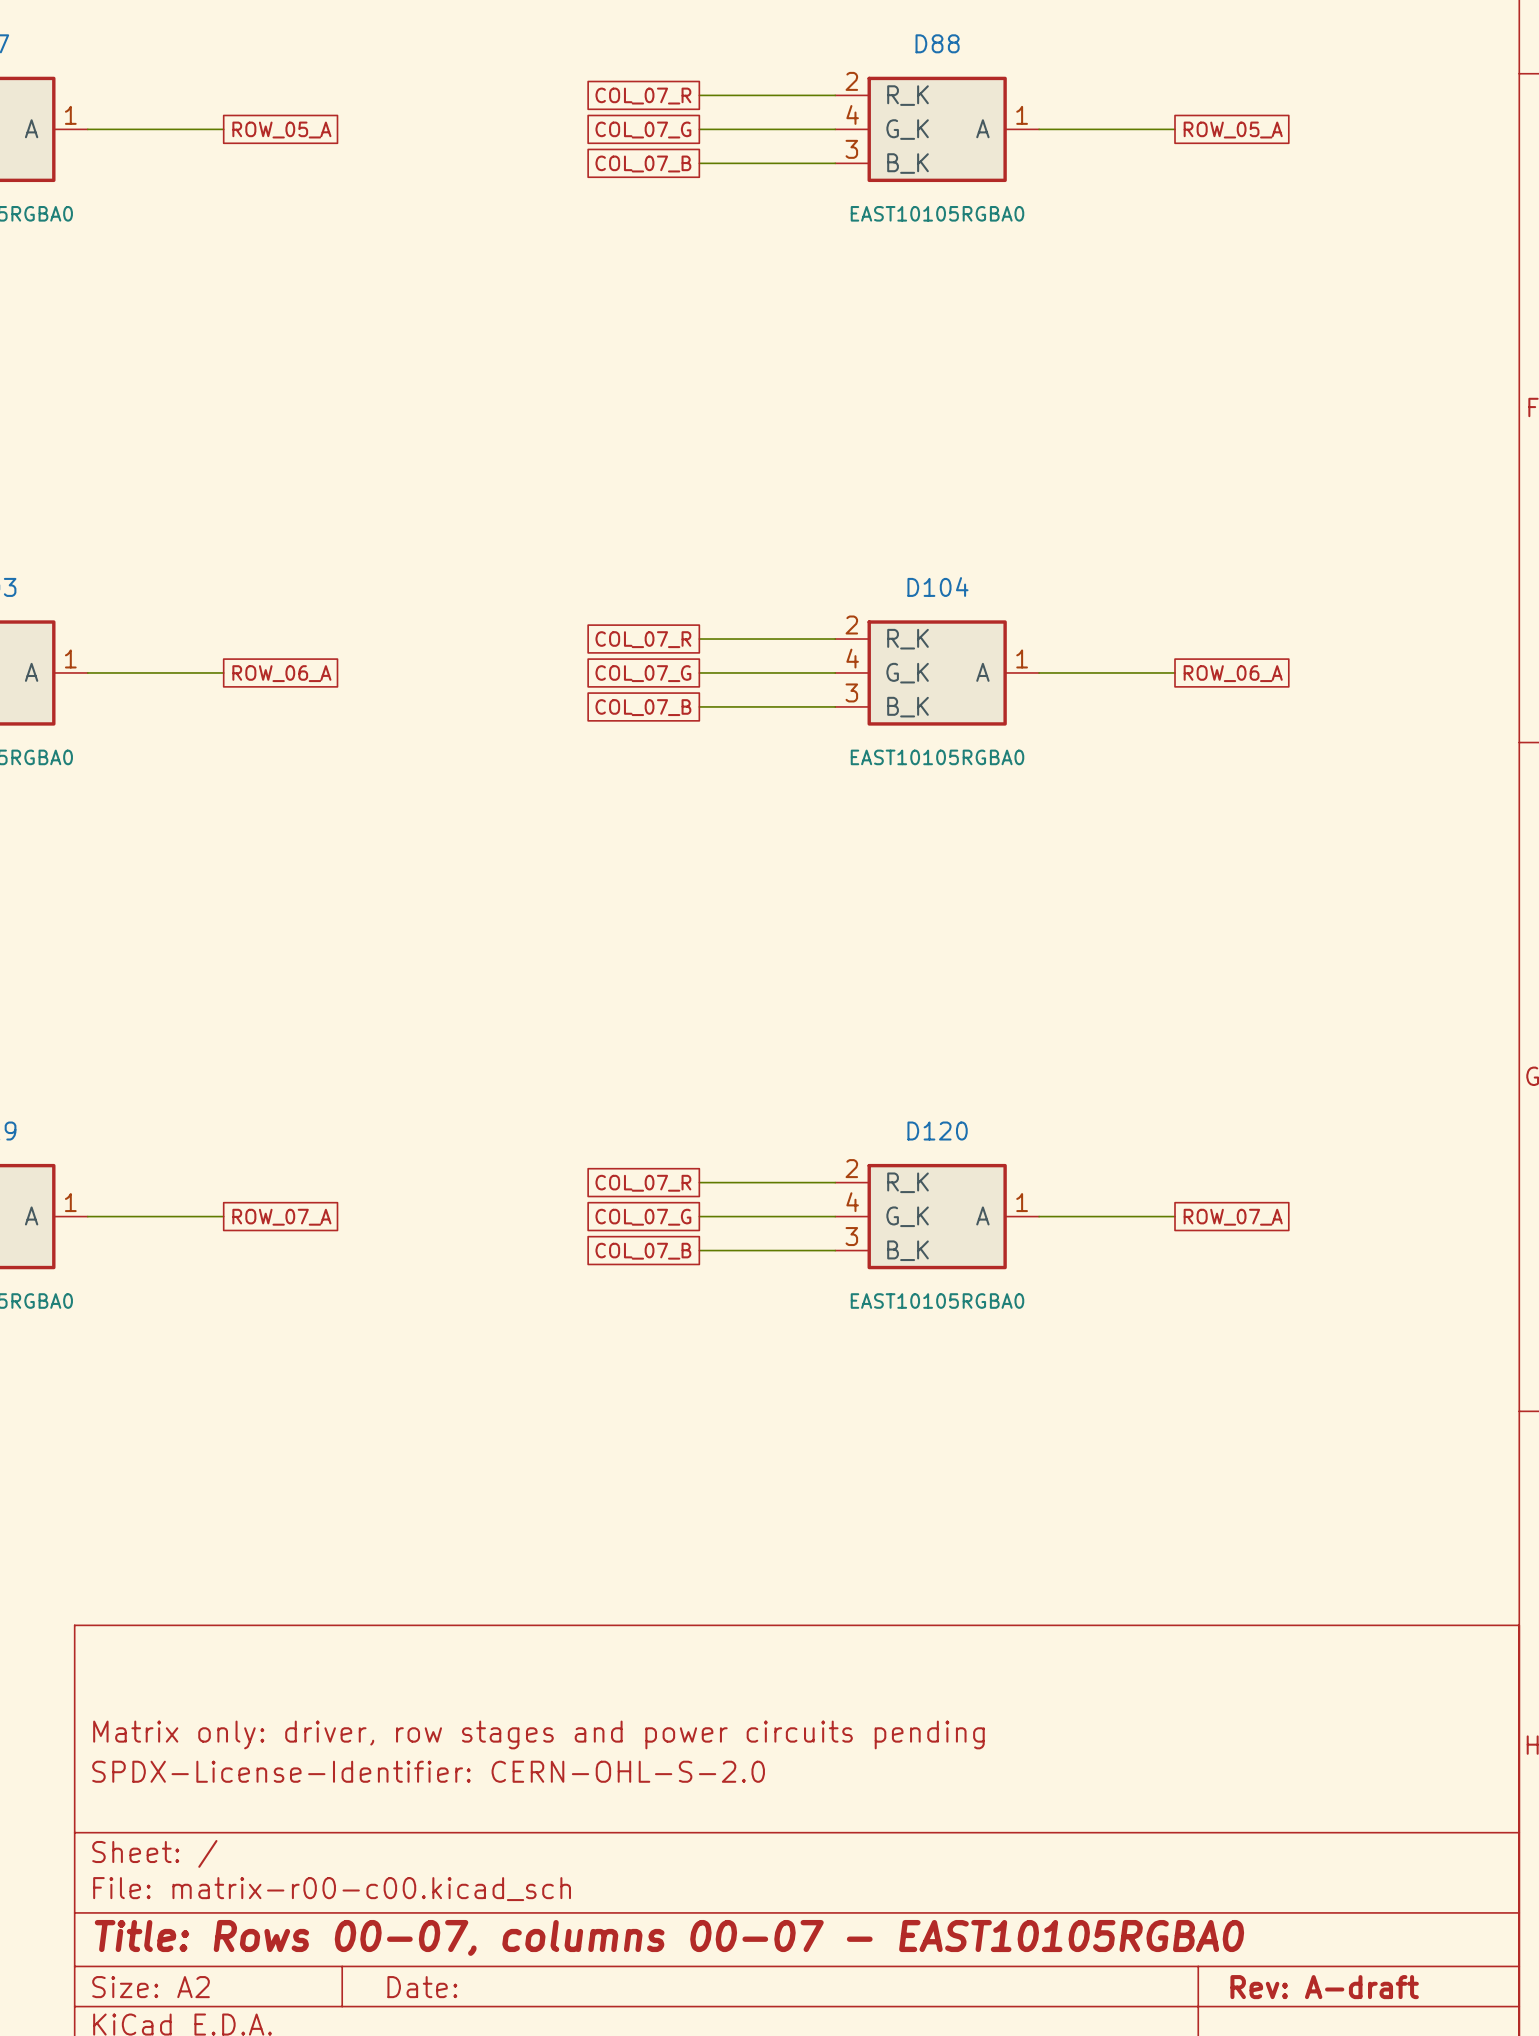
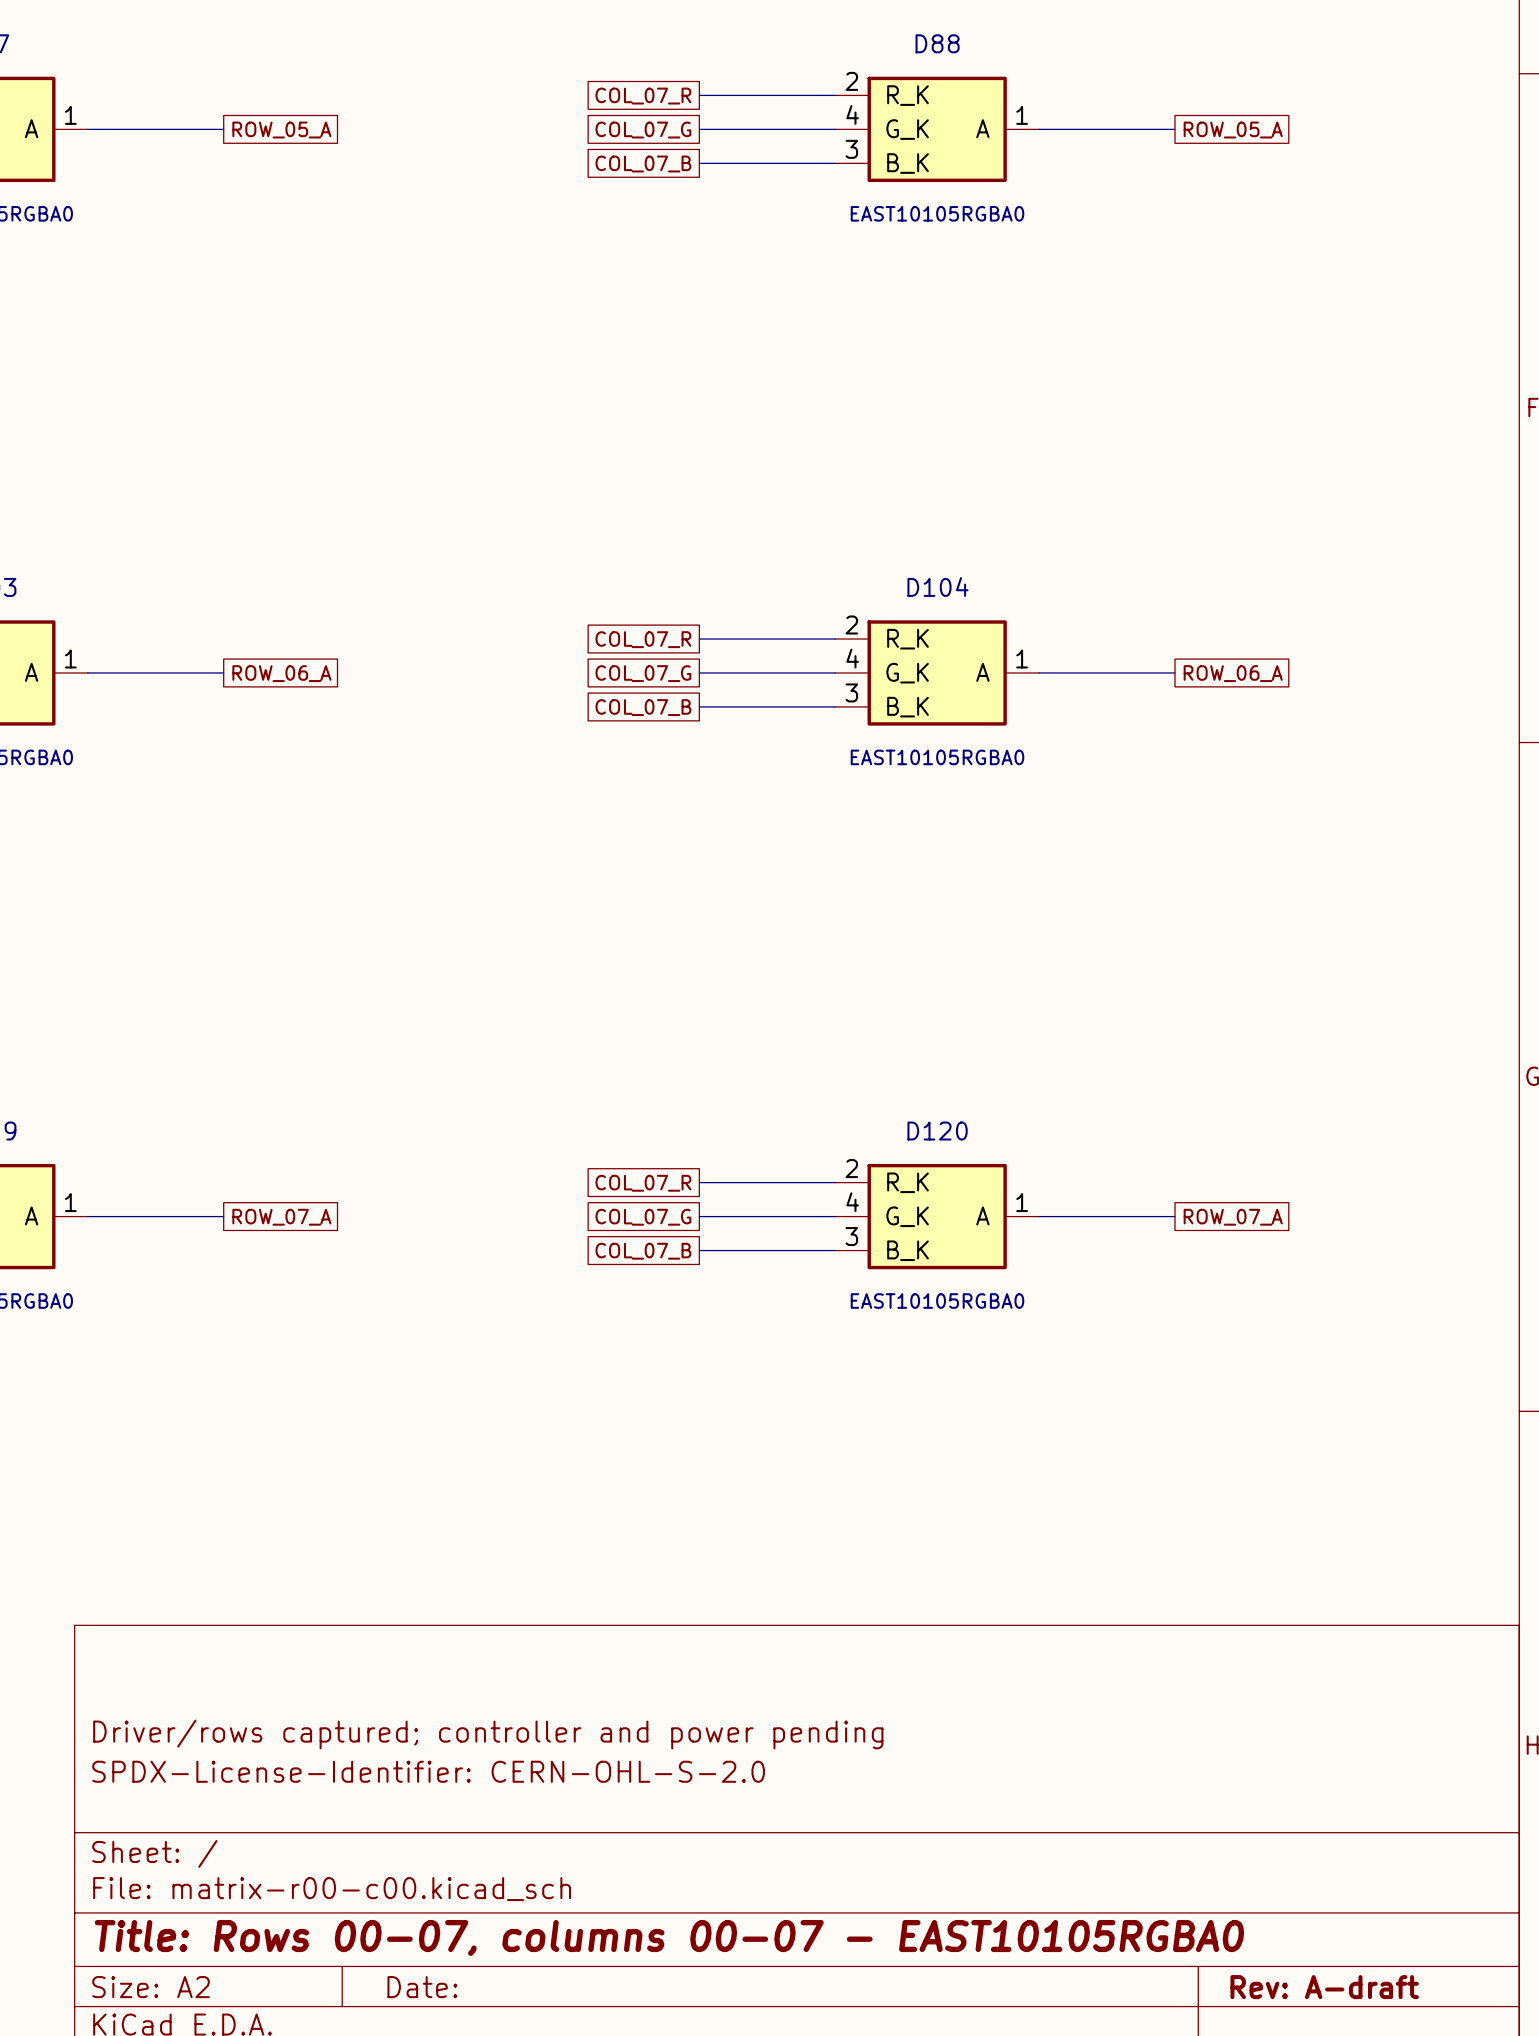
title block: Matrix only: driver, row stages and power circuits pending (538, 1734) -> Driver/rows captured; controller and power pending (488, 1734)

